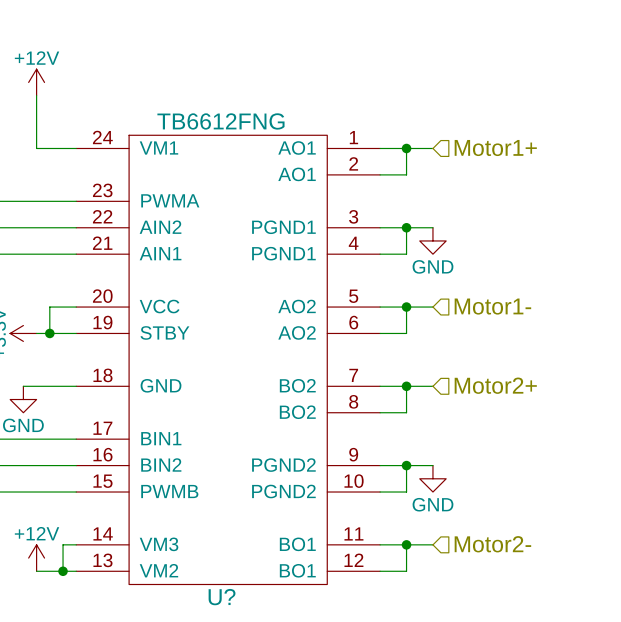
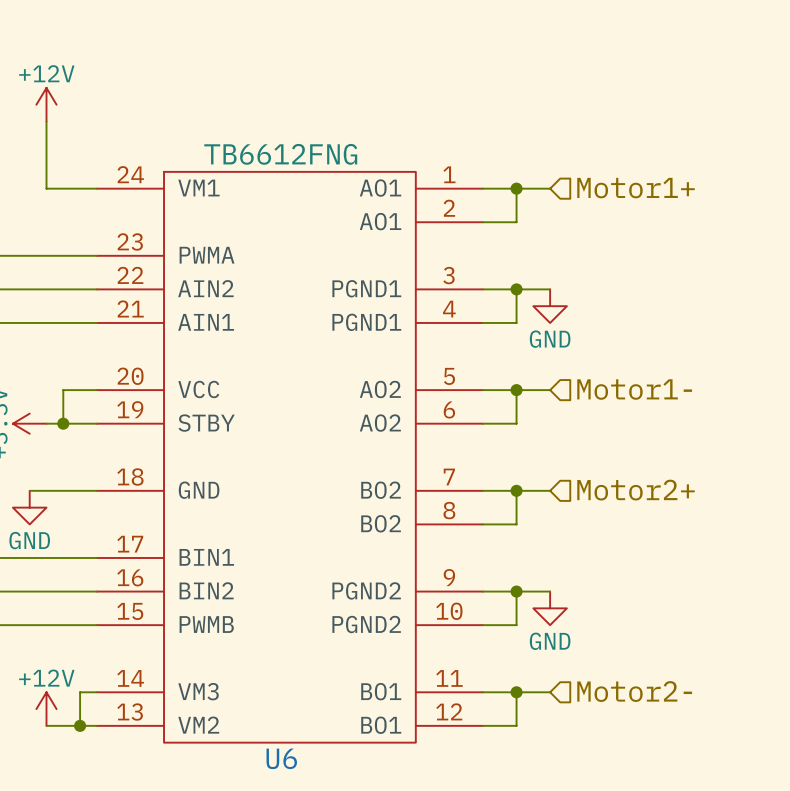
U? name: U? (222, 597) -> U6 (281, 758)

